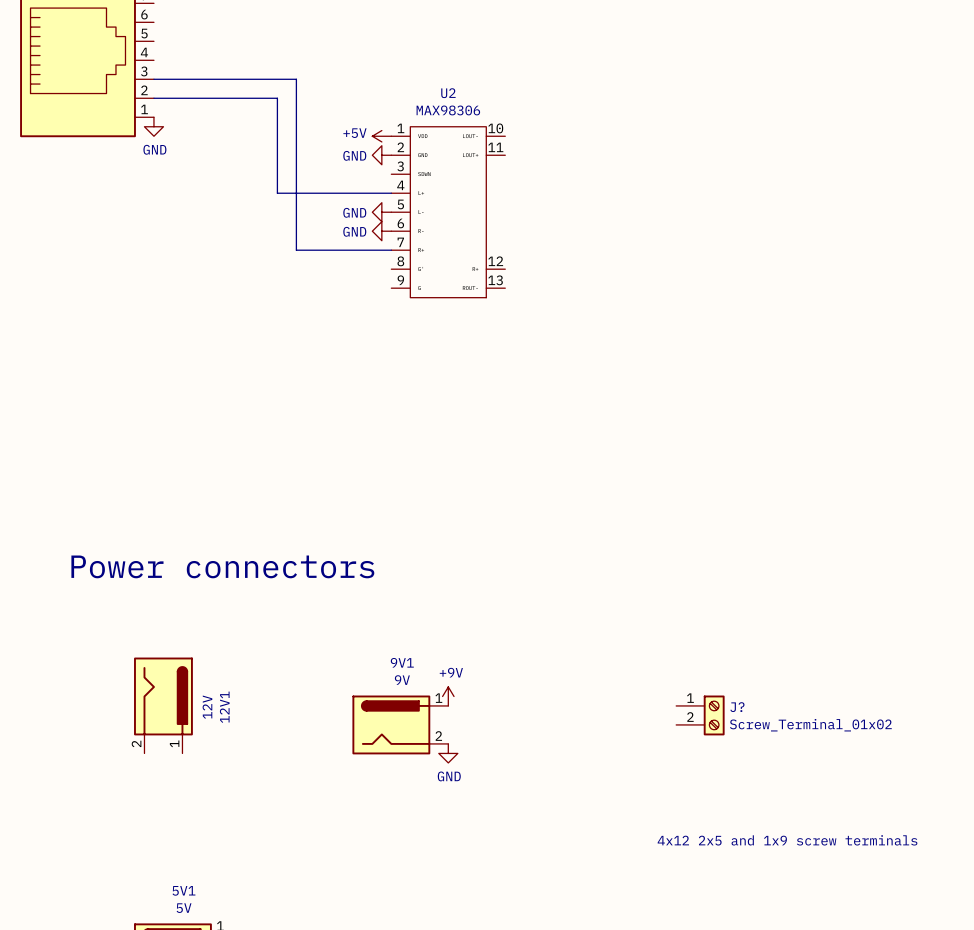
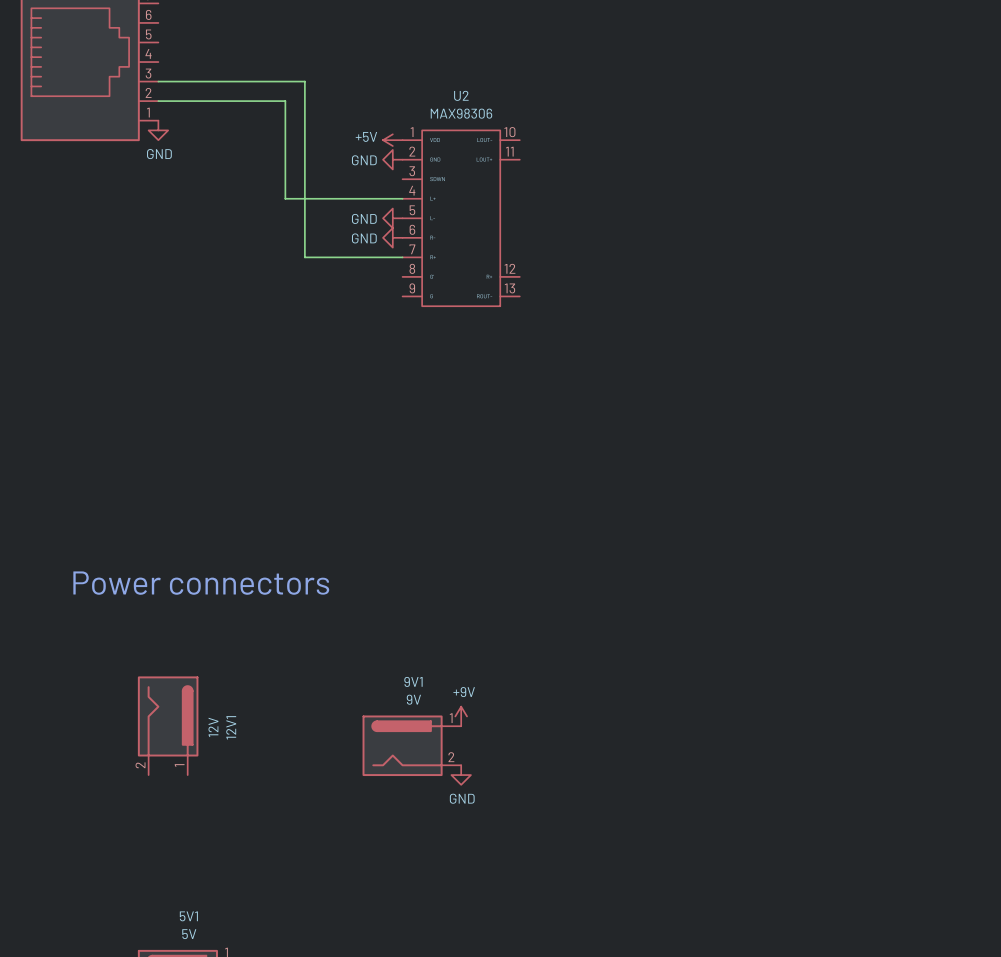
J?: Screw_Terminal_01x02 (700, 715) -> none
text: 4x12 2x5 and 1x9 screw terminals (787, 840) -> none

